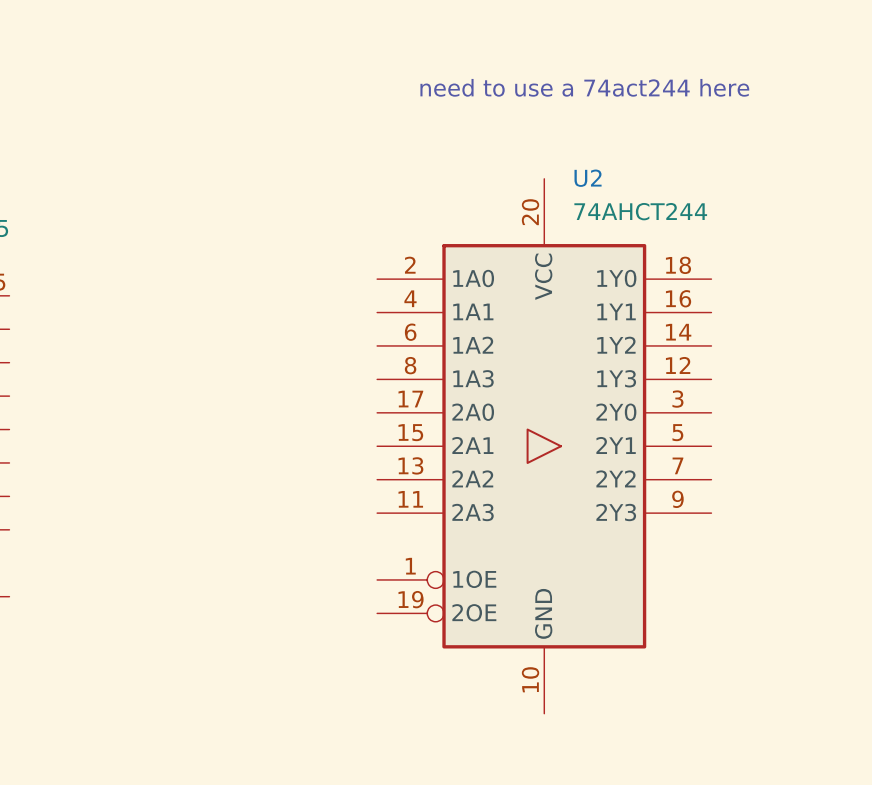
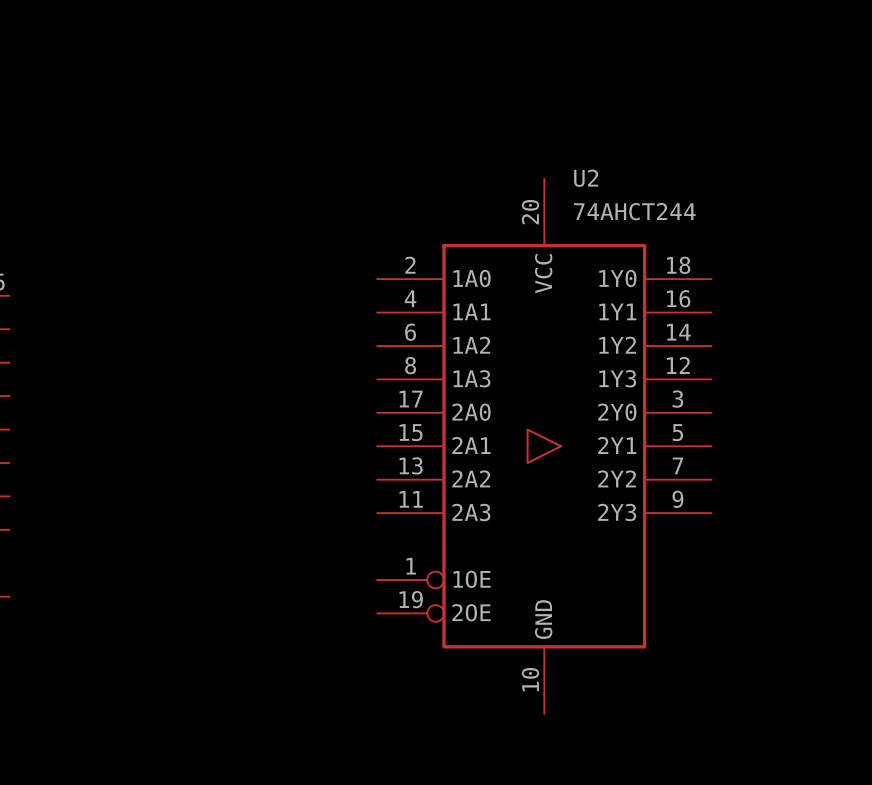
text: need to use a 74act244 here (584, 87) -> none

